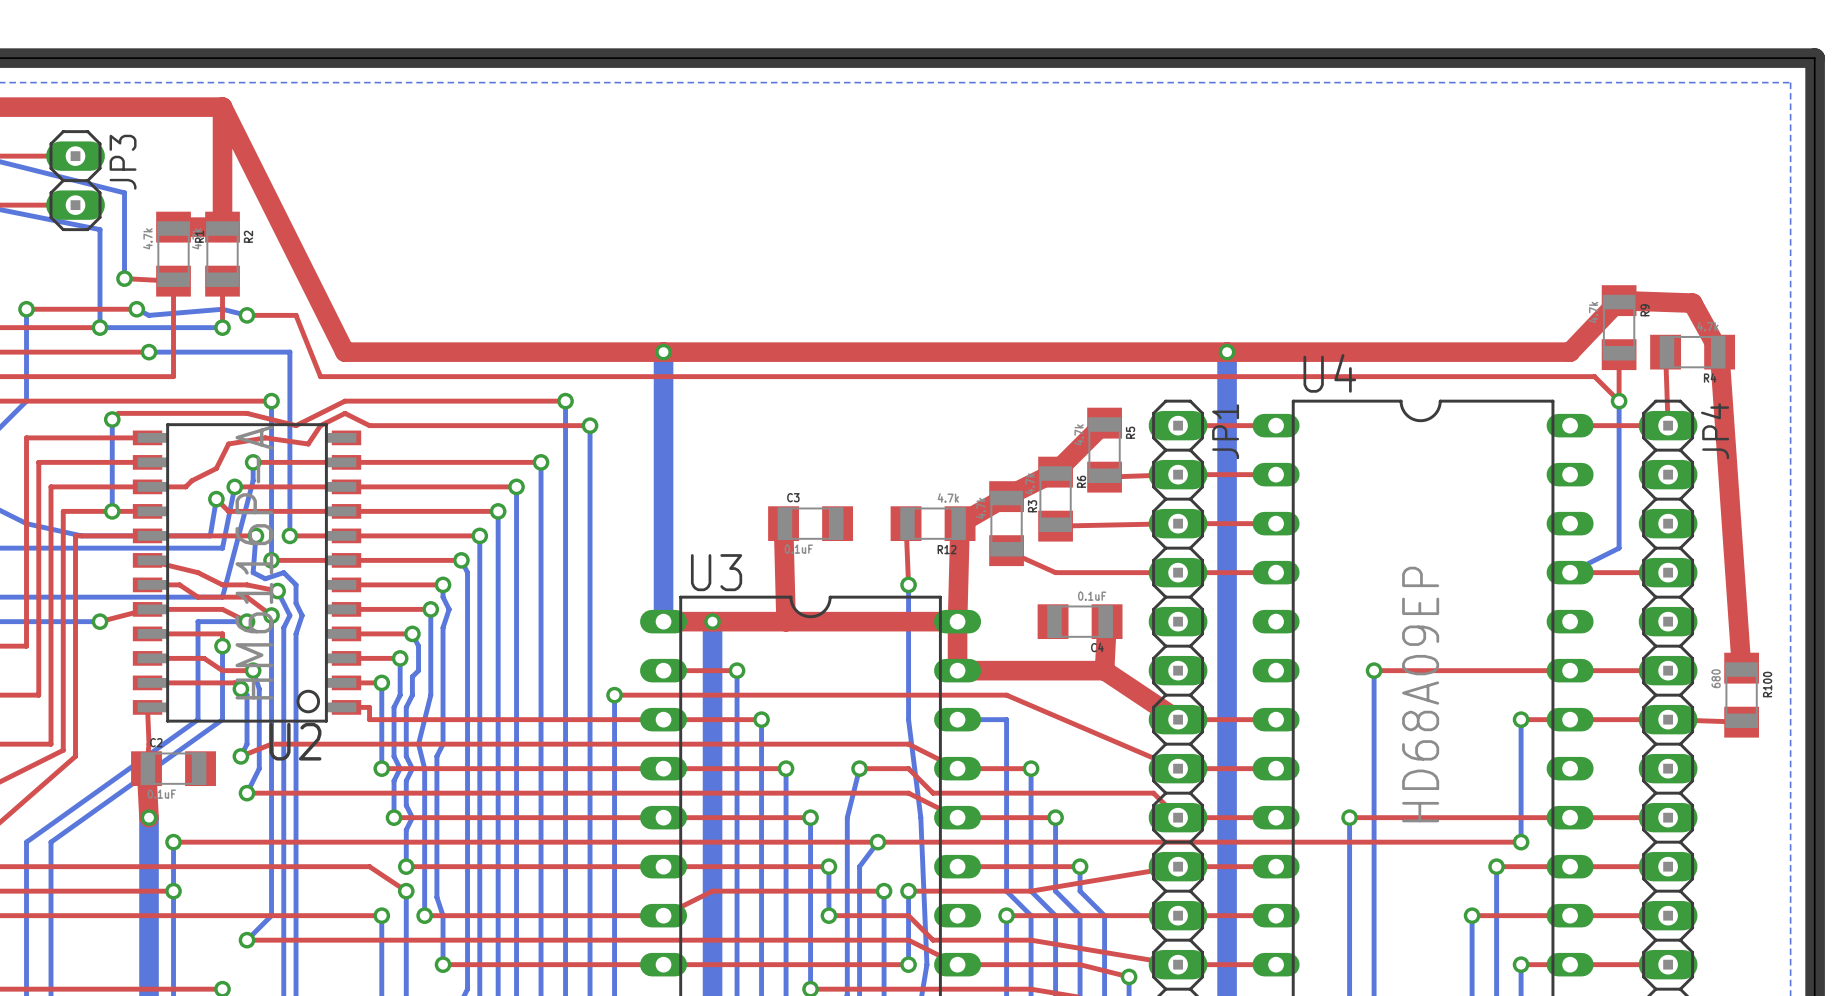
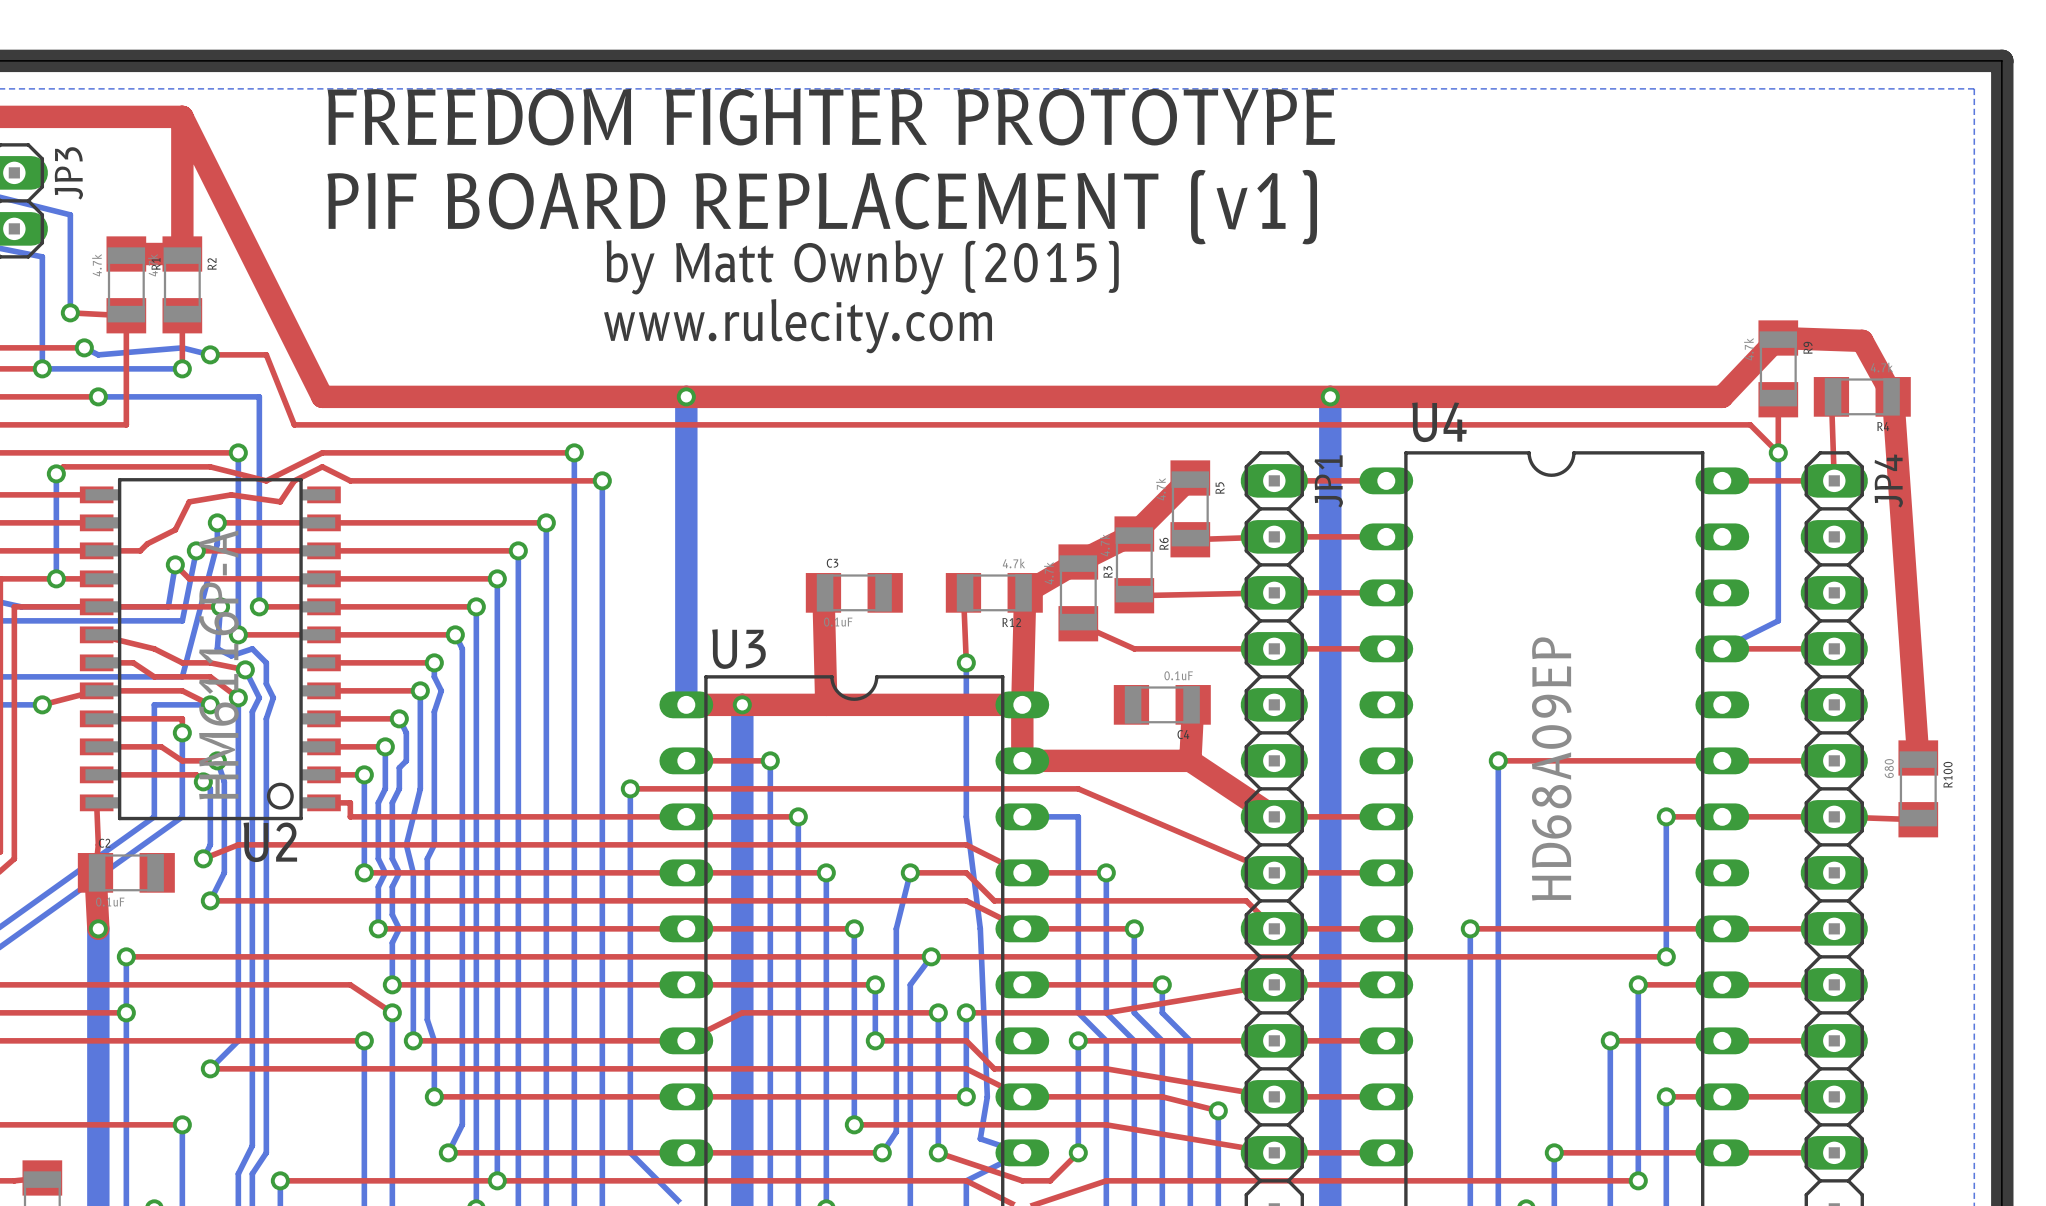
text: none -> FREEDOM FIGHTER PROTOTYPE (831, 117)
text: none -> PIF BOARD REPLACEMENT (v1) (822, 207)
text: none -> by Matt Ownby (2015) (862, 267)
text: none -> www.rulecity.com (798, 326)

